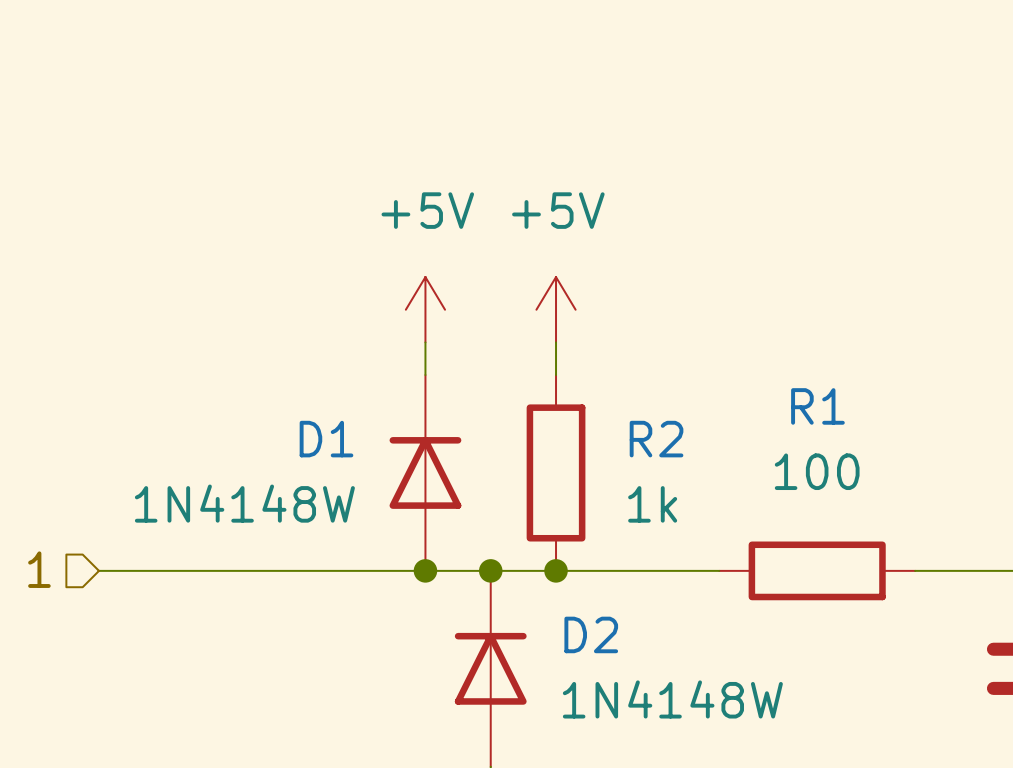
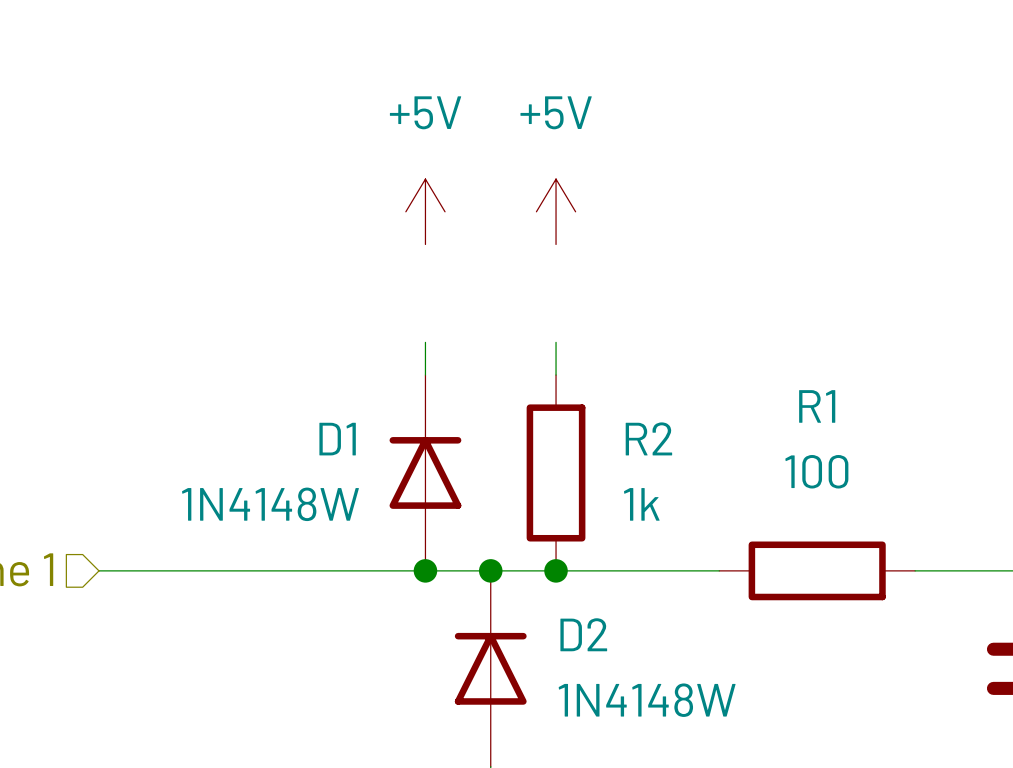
power symbol: none -> +5V (425, 211)
power symbol: none -> +5V (556, 211)
power symbol: +5V (425, 309) -> none
power symbol: +5V (556, 309) -> none

